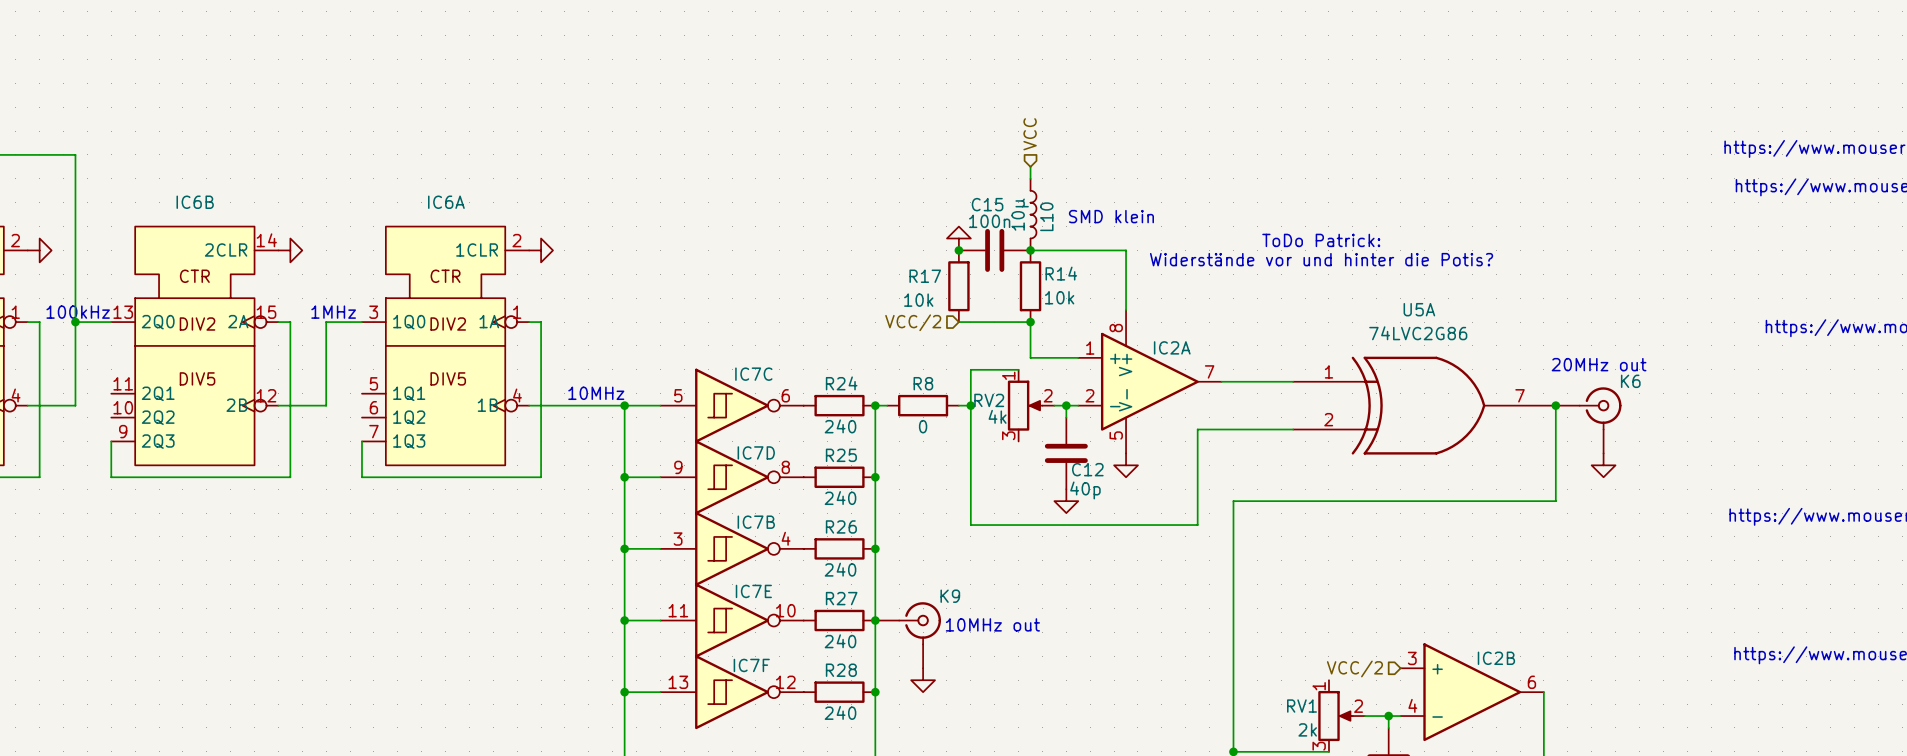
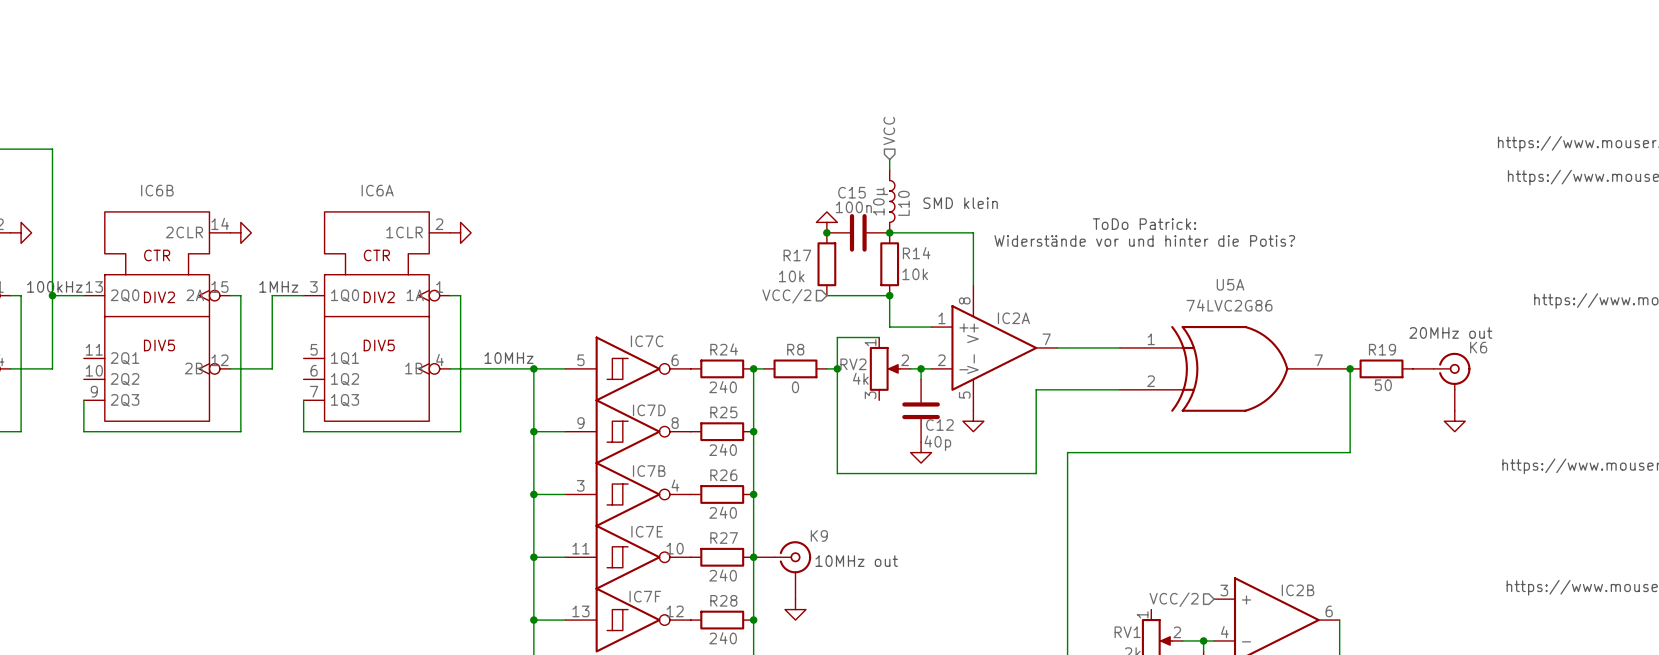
text position: 20MHz out (1599, 364) -> 20MHz out (1450, 332)
R19: none -> 50 (1381, 368)
K6 position: (1588, 420) -> (1441, 381)
power symbol position: (1603, 465) -> (1454, 421)

